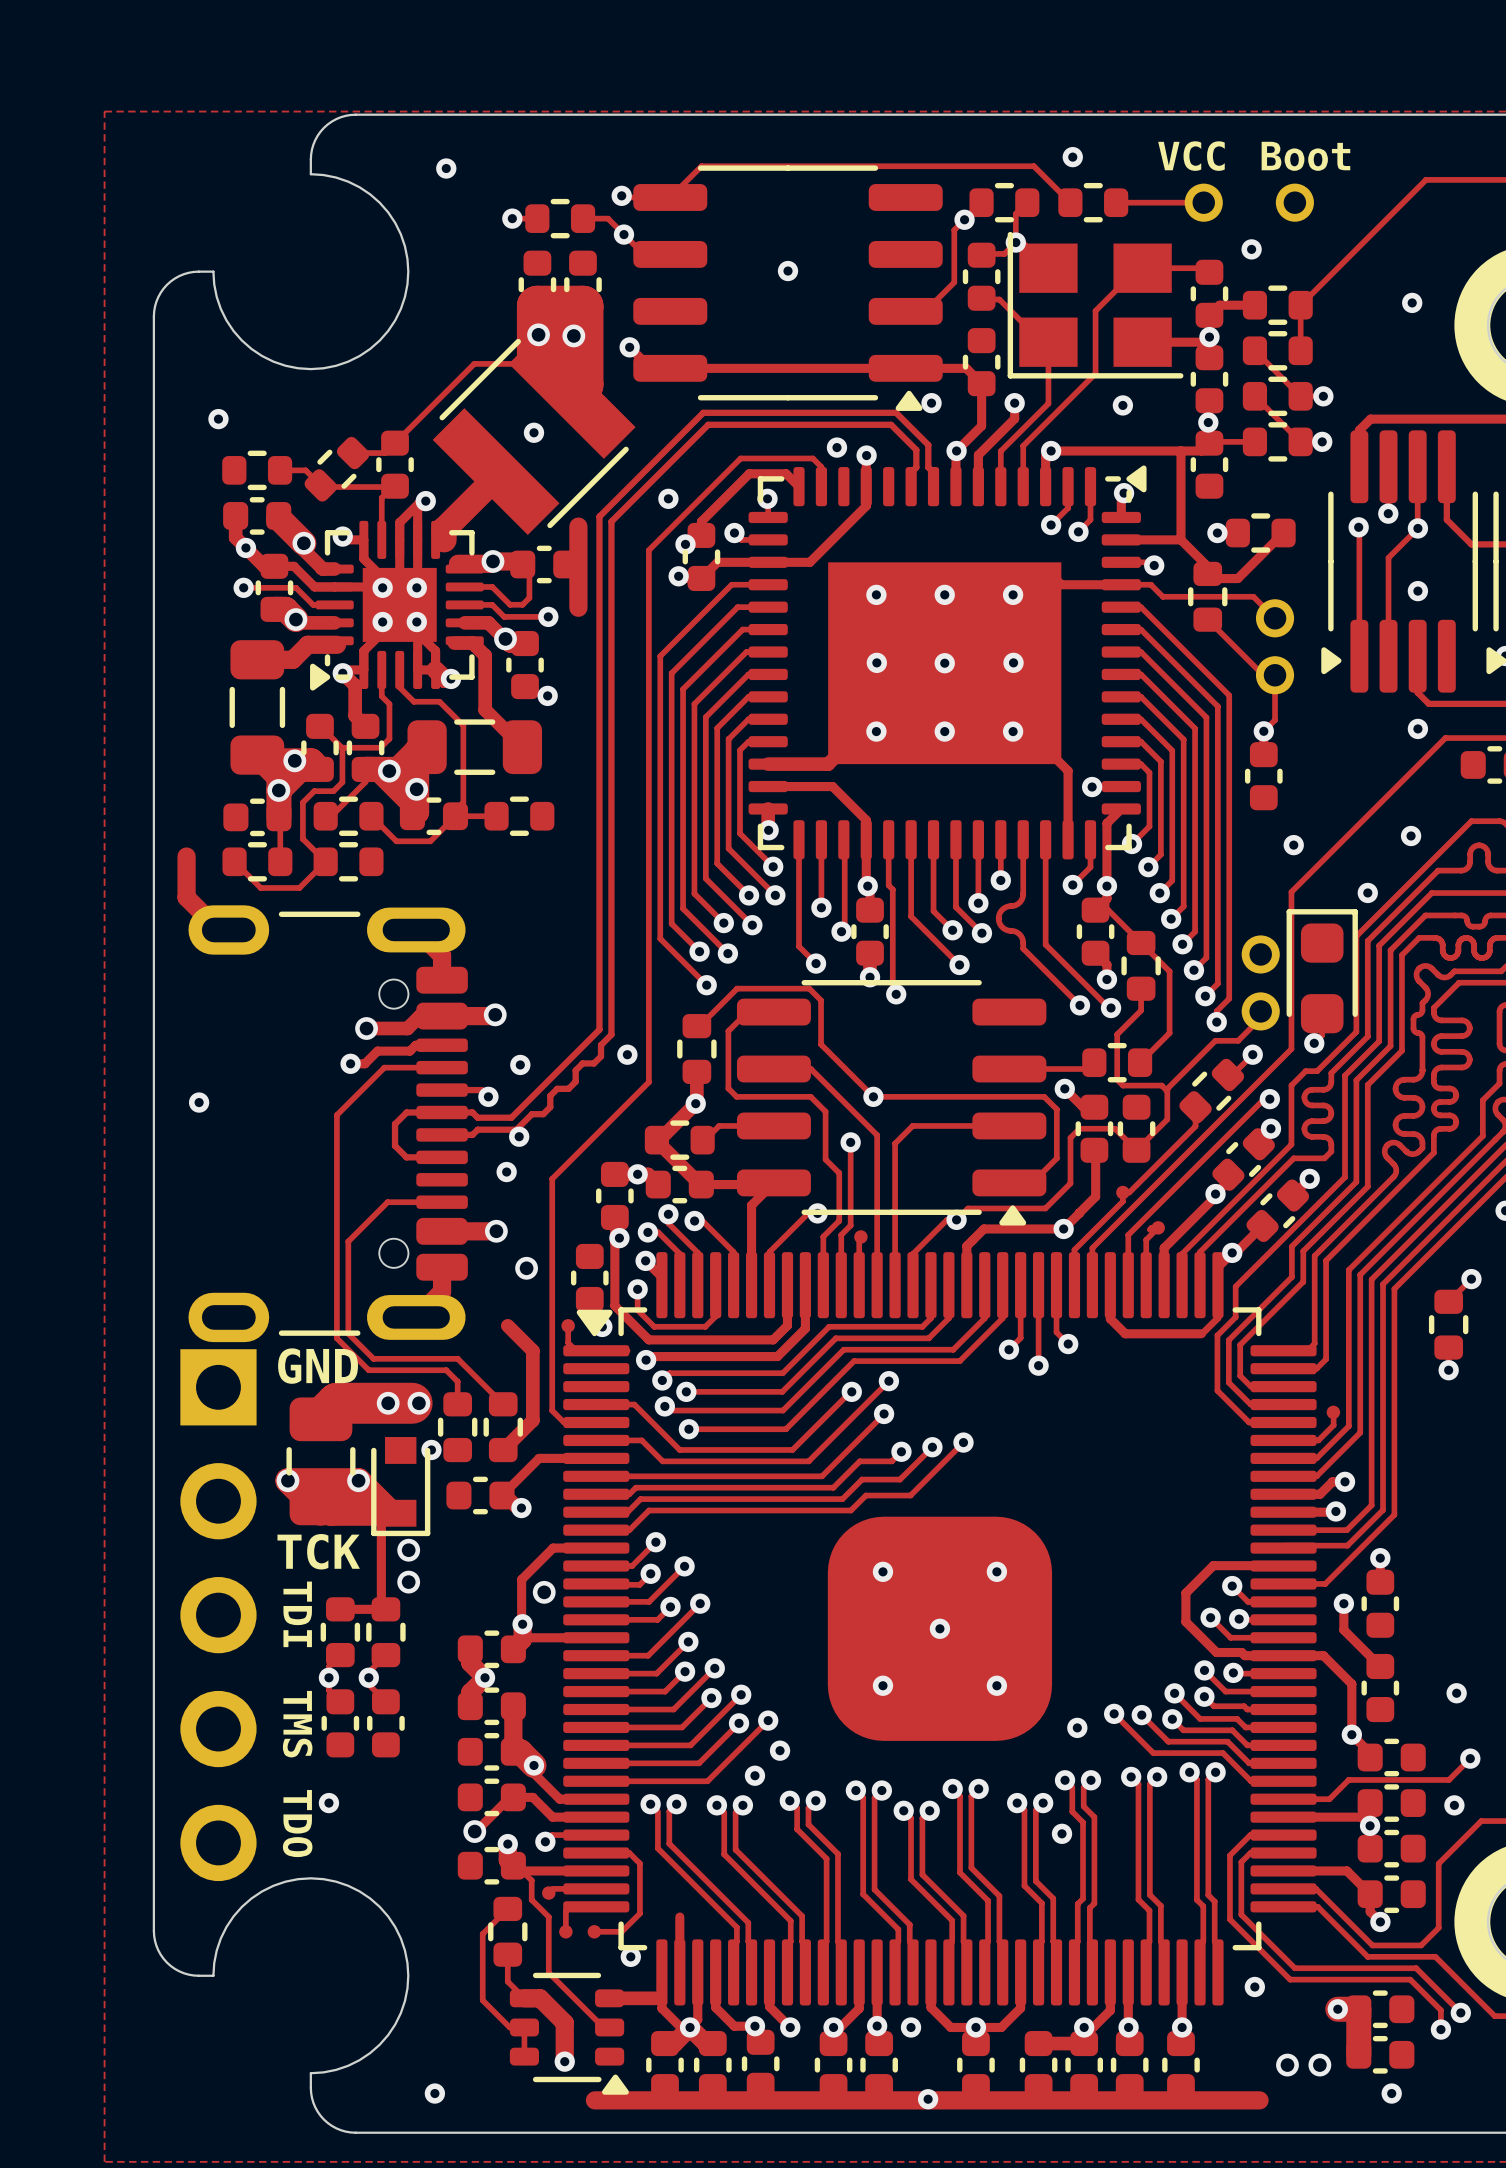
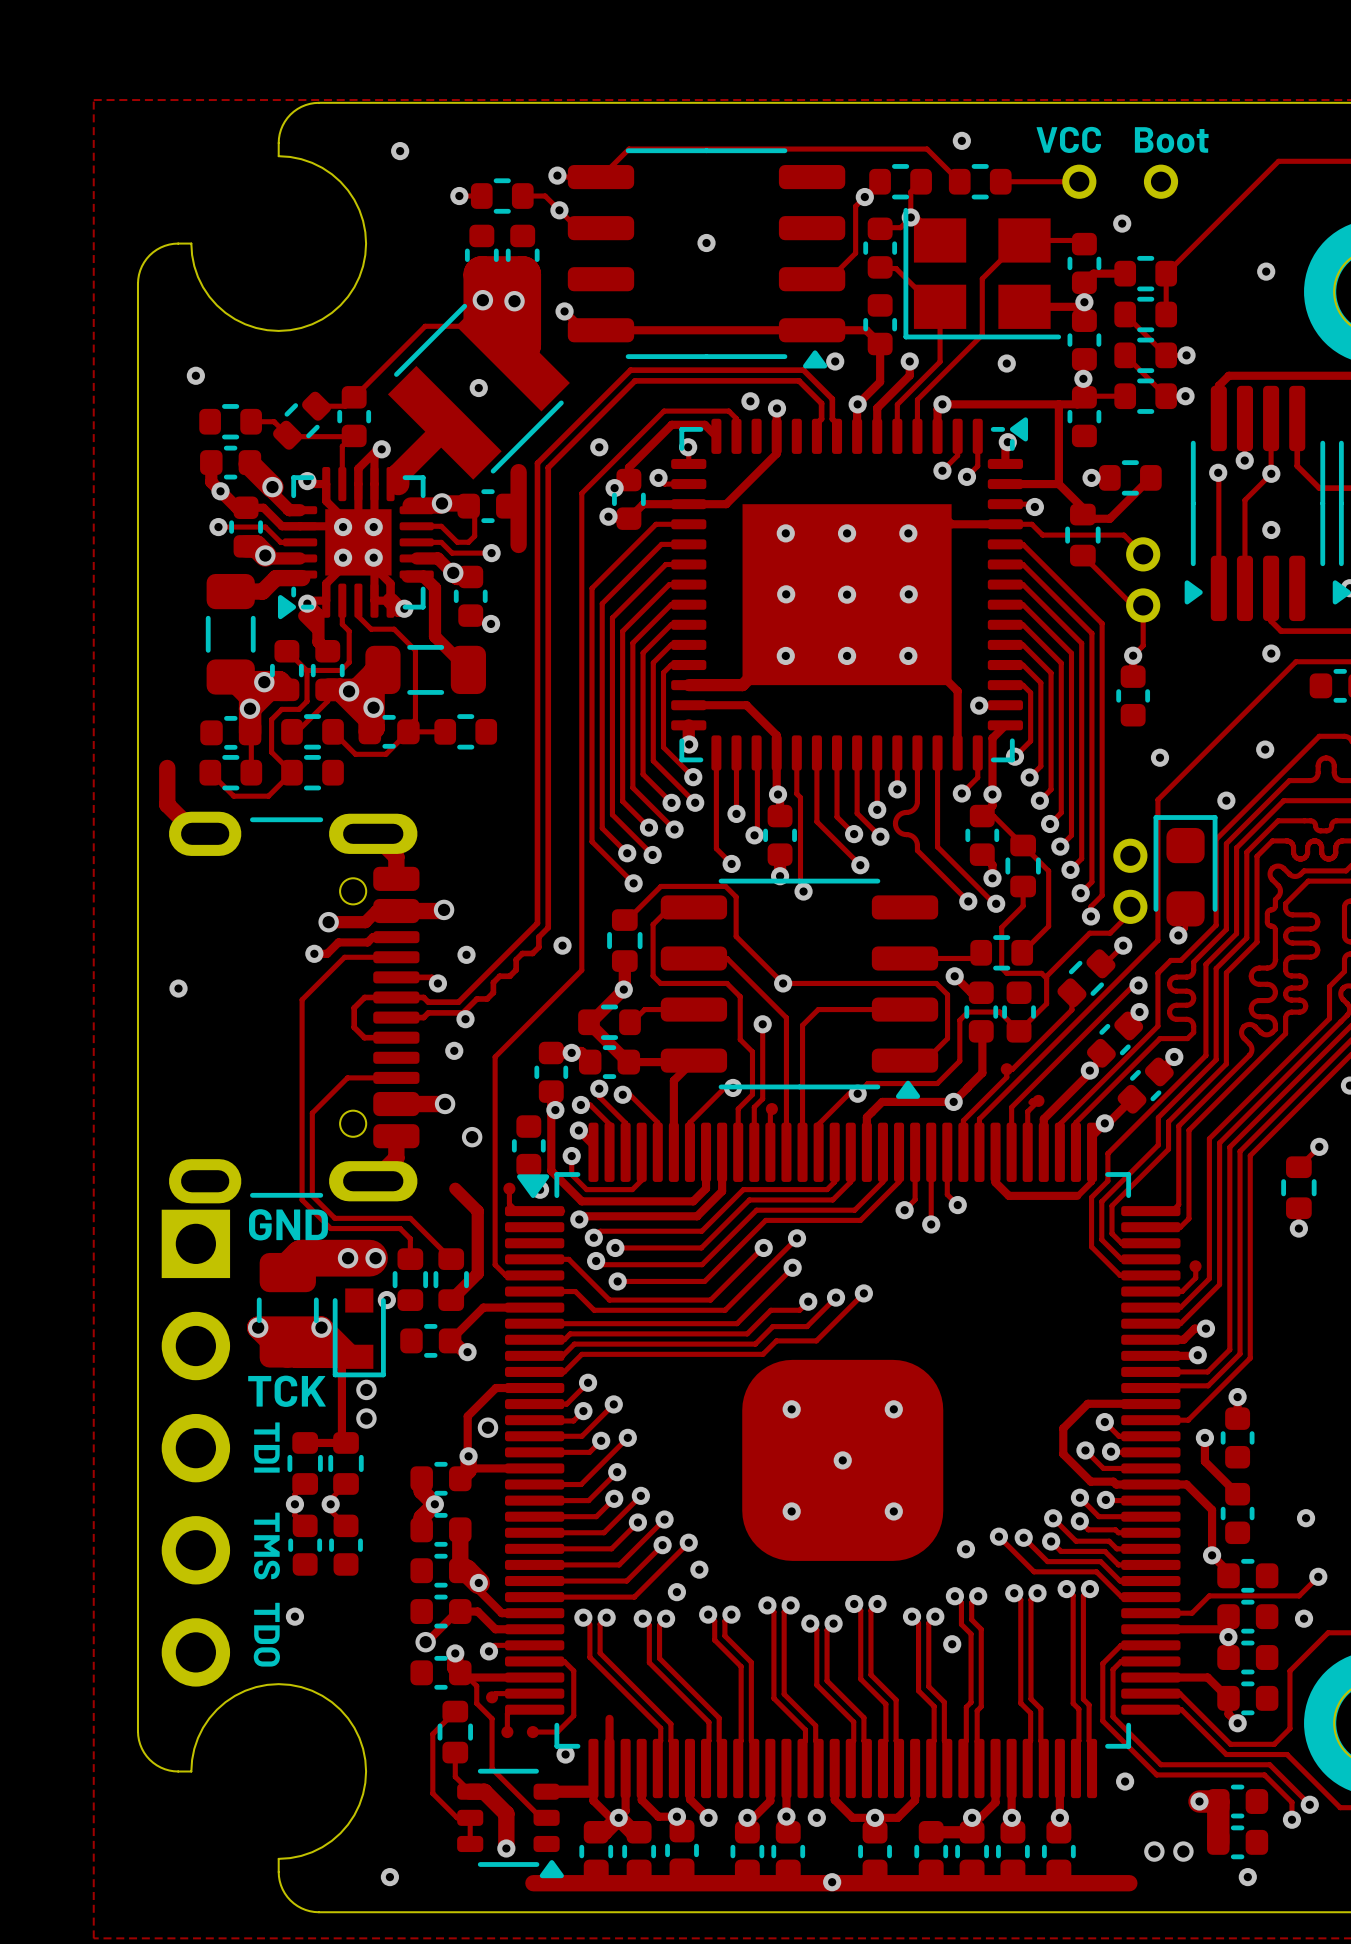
track: none -> (304, 615) (316, 627)

